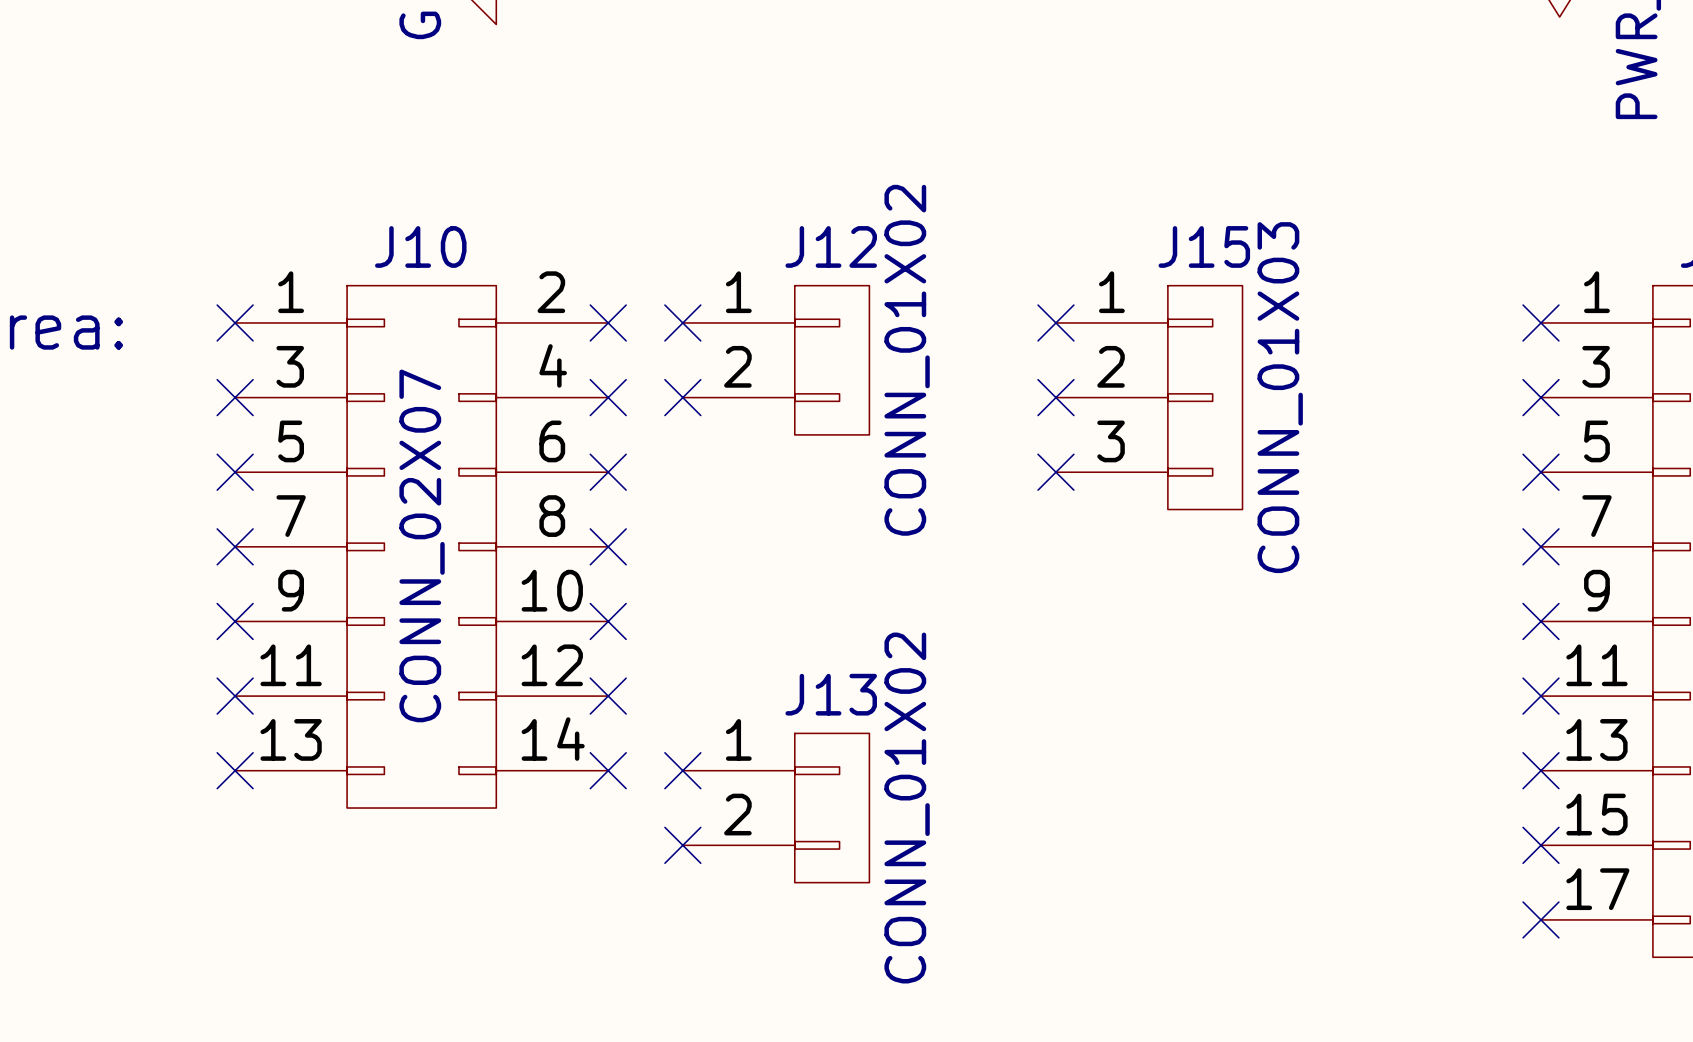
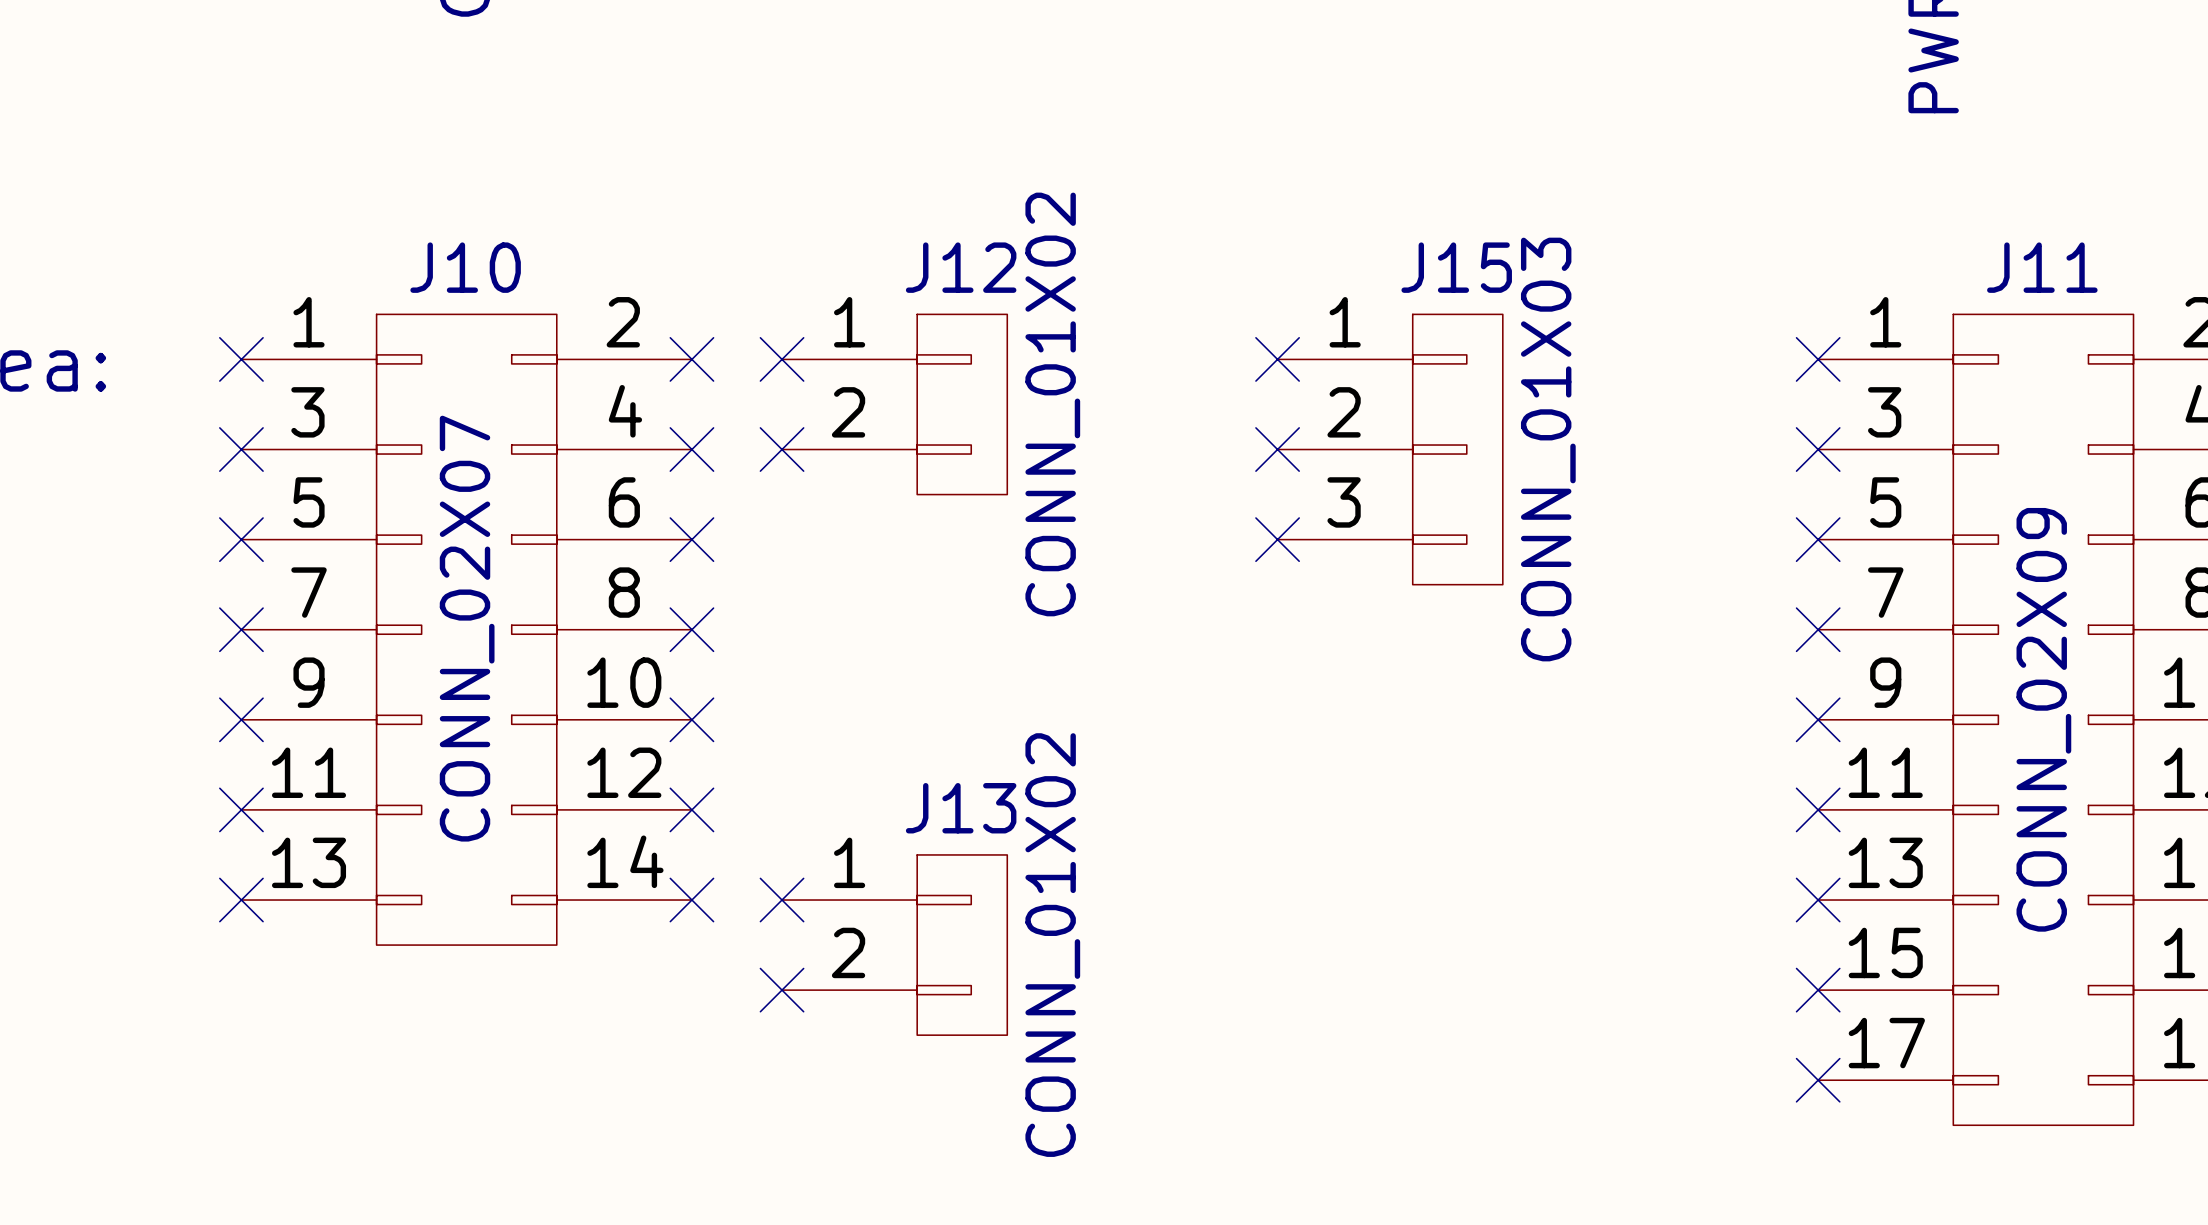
no-connect mark position: (1055, 322) -> (1277, 359)
no-connect mark position: (1055, 397) -> (1277, 449)
J15 position: (1149, 397) -> (1390, 449)
no-connect mark position: (1055, 472) -> (1277, 539)

